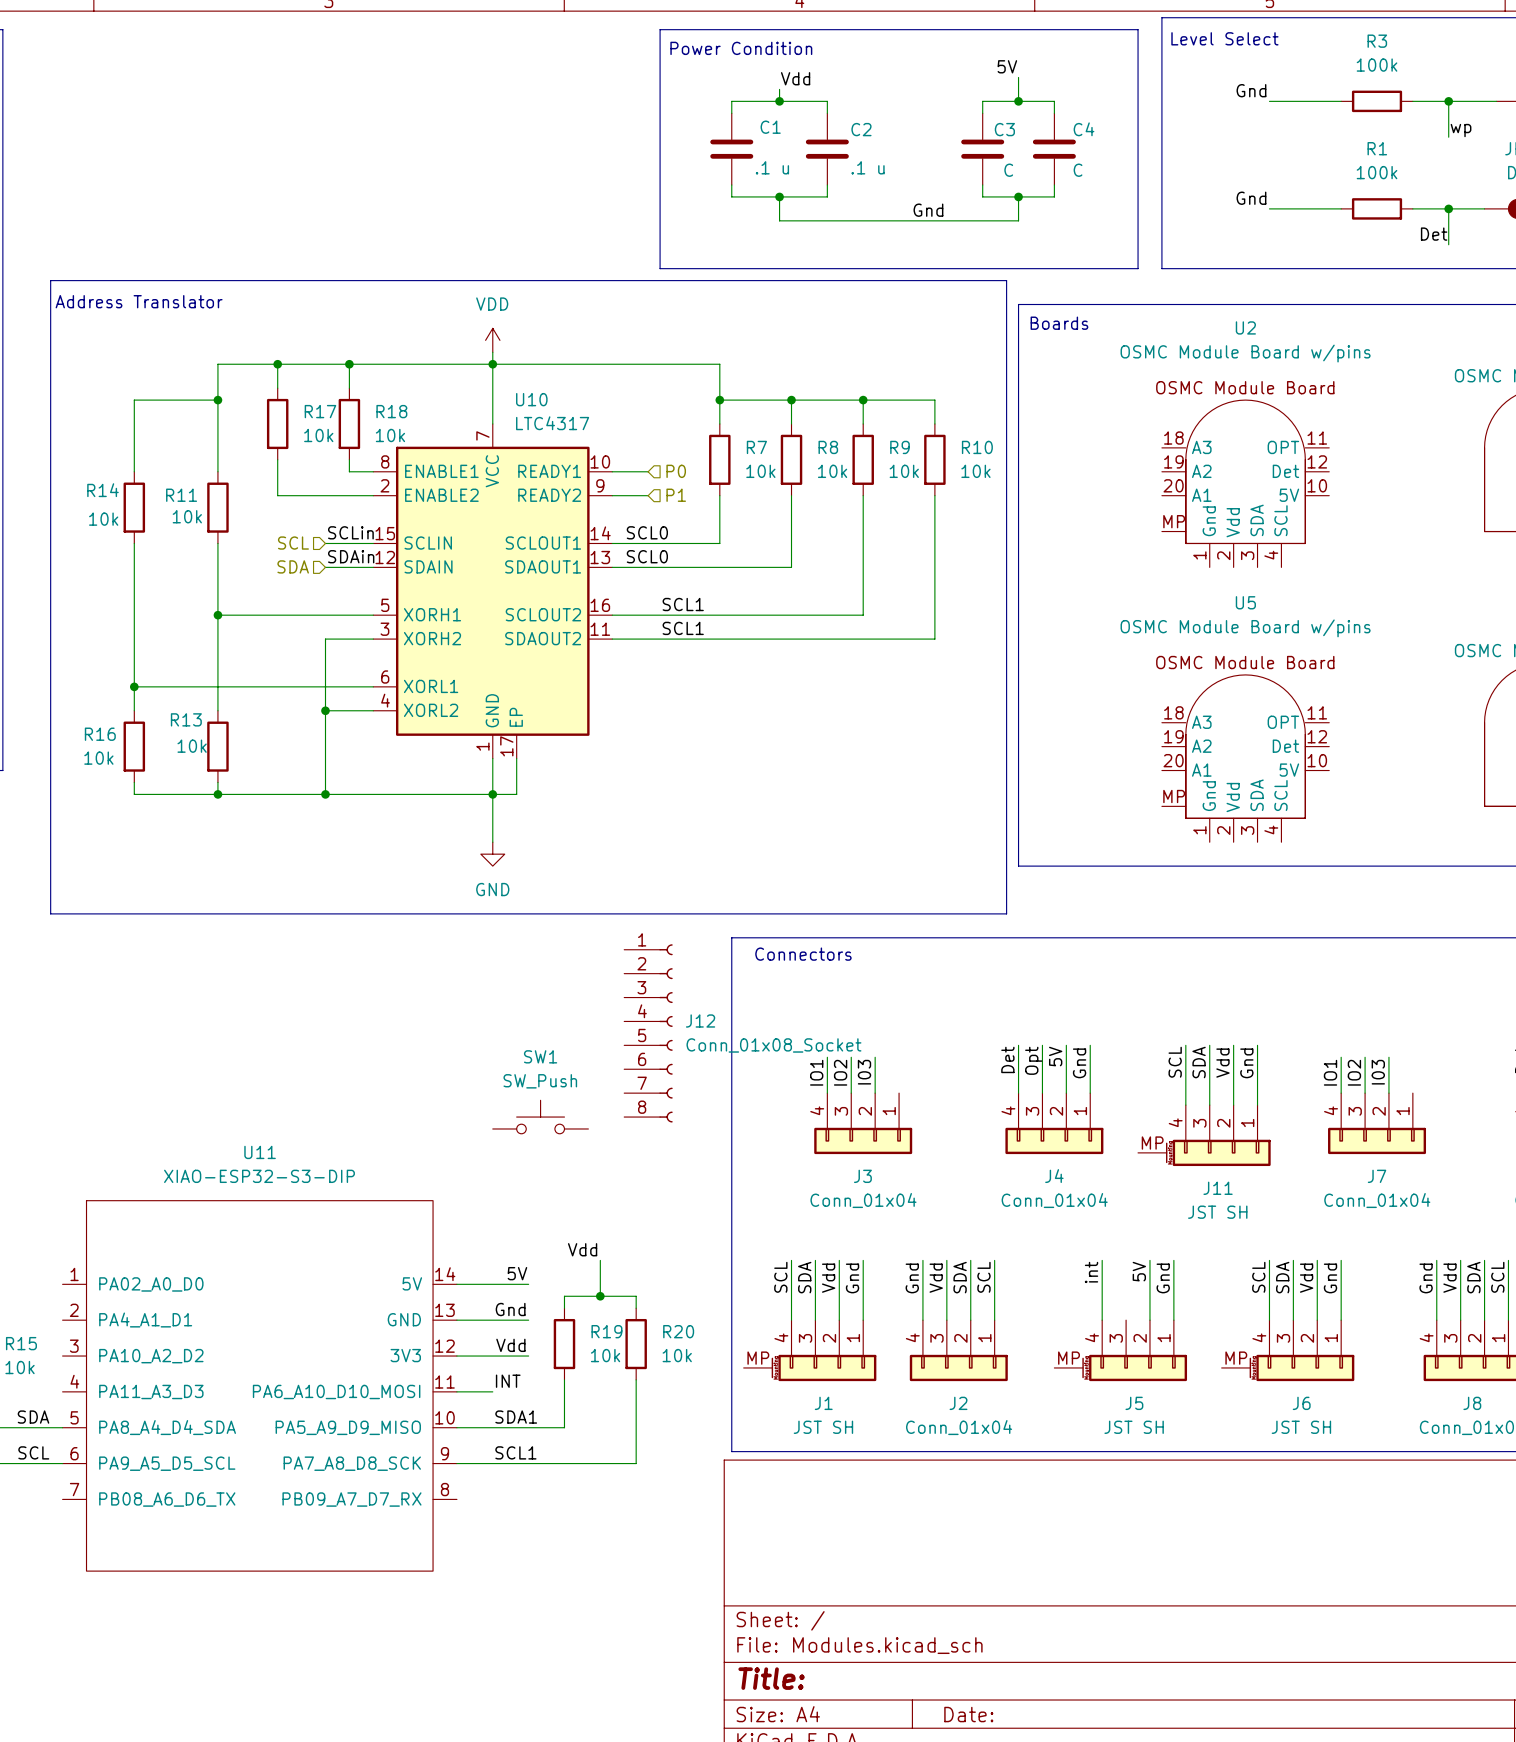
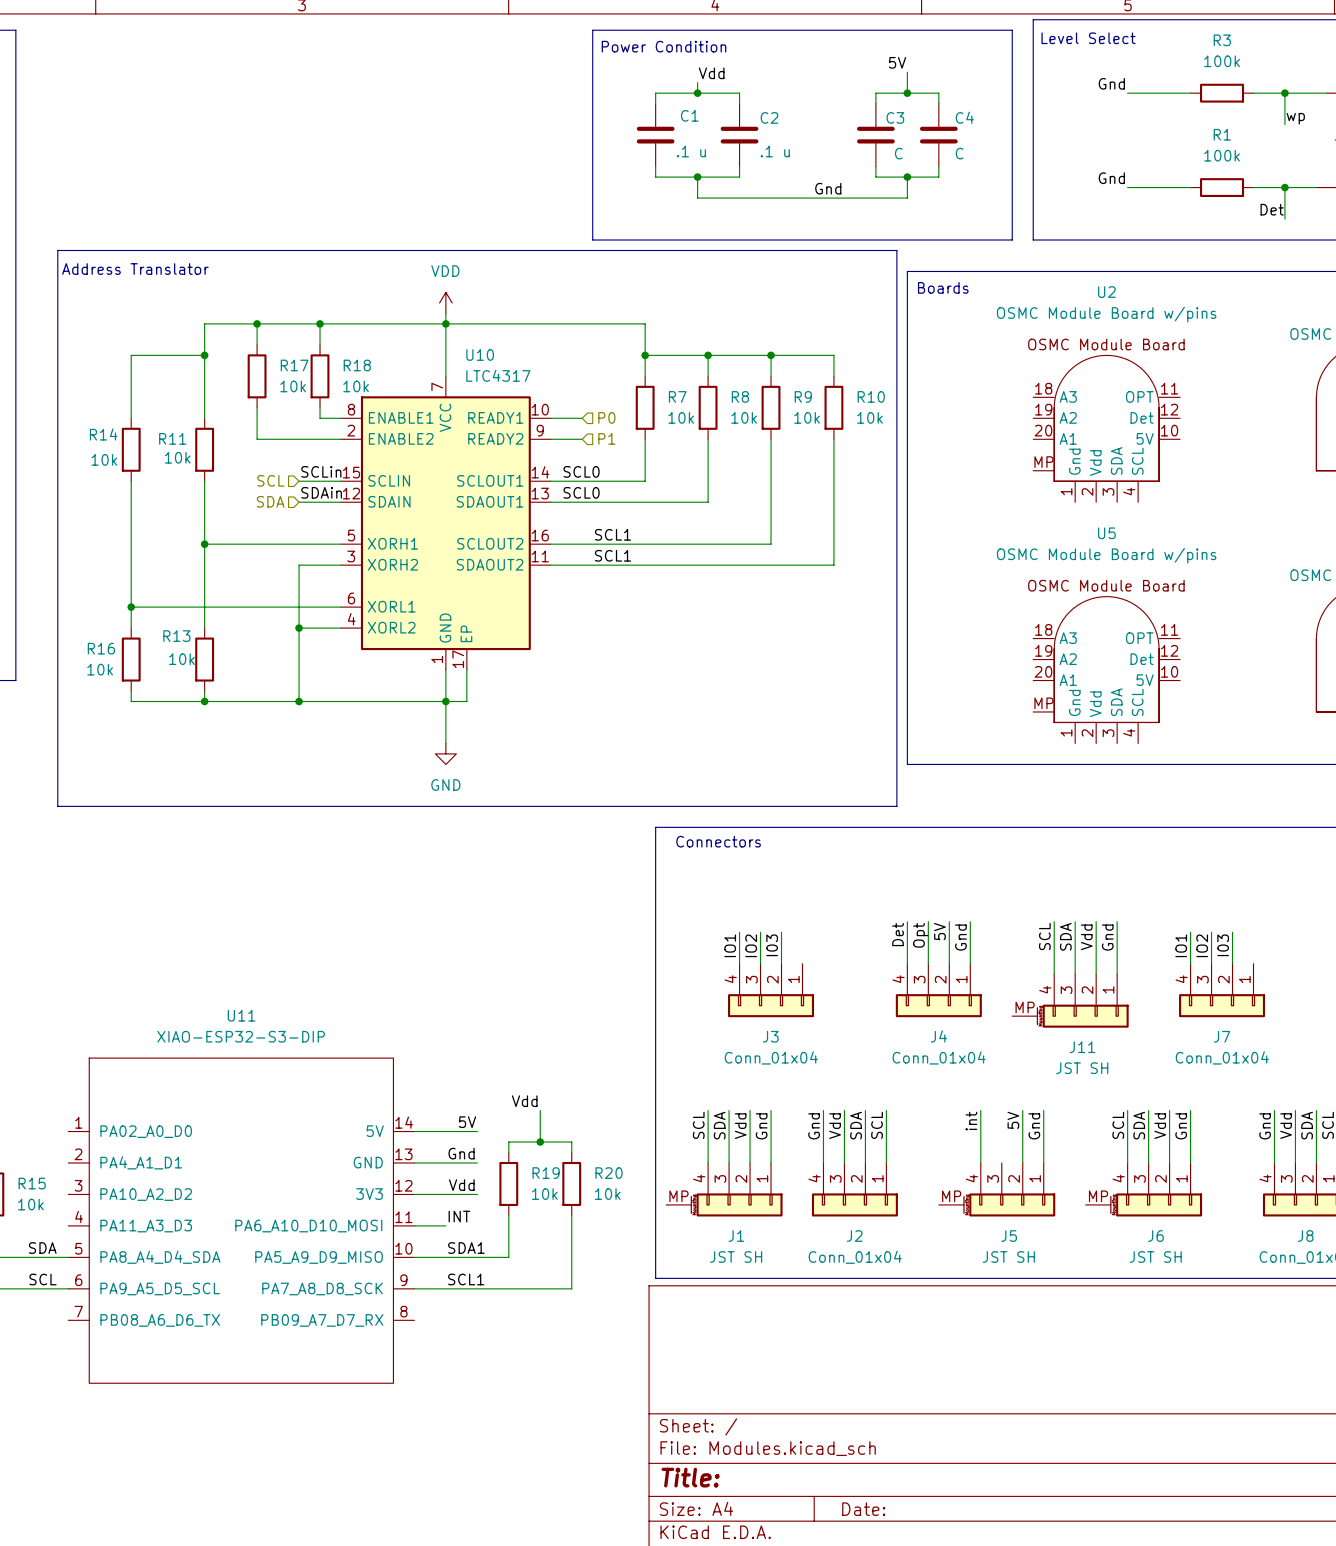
J12: Conn_01x08_Socket (648, 1033) -> none
SW1: SW_Push (540, 1117) -> none

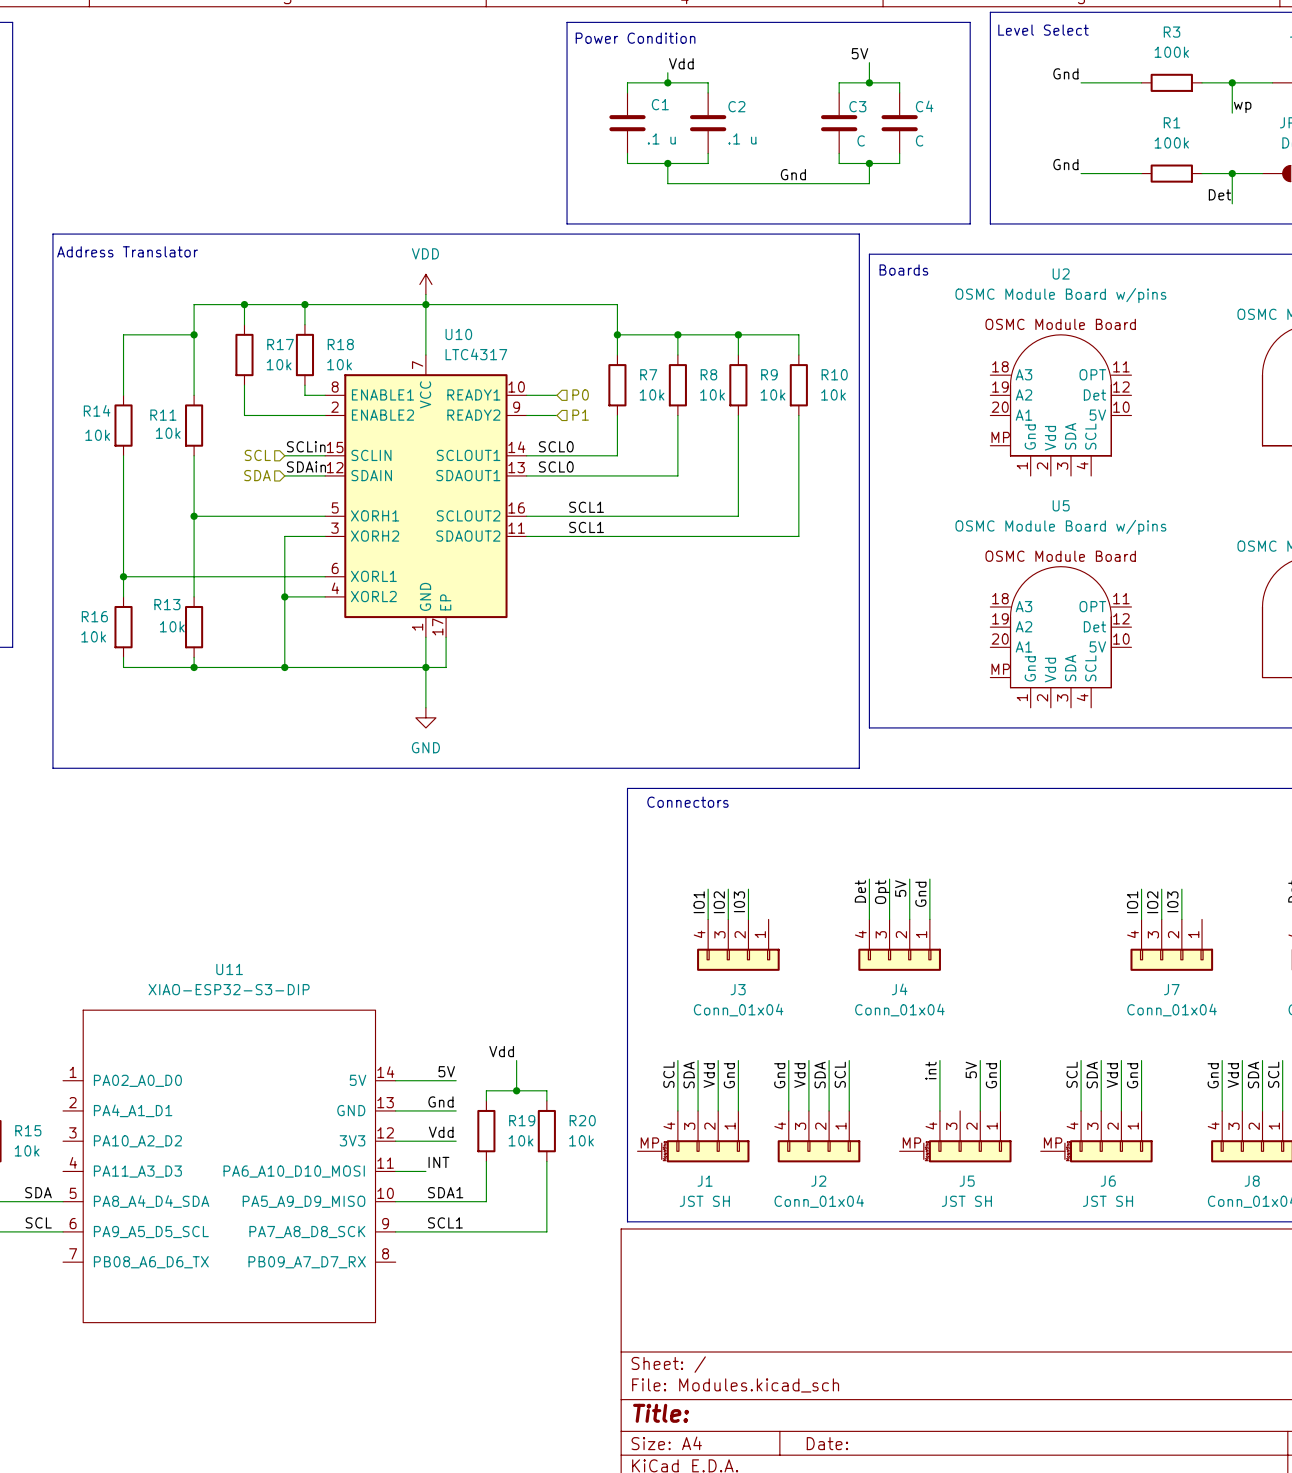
wire: (1054, 921) (1054, 974) -> none
wire: (1075, 921) (1075, 974) -> none
wire: (1096, 921) (1096, 974) -> none
wire: (1117, 921) (1117, 974) -> none
label: SCL (1044, 936) -> none
label: SDA (1065, 936) -> none
label: Vdd (1086, 937) -> none
label: Gnd (1107, 937) -> none
J11: JST SH (1070, 1000) -> none

